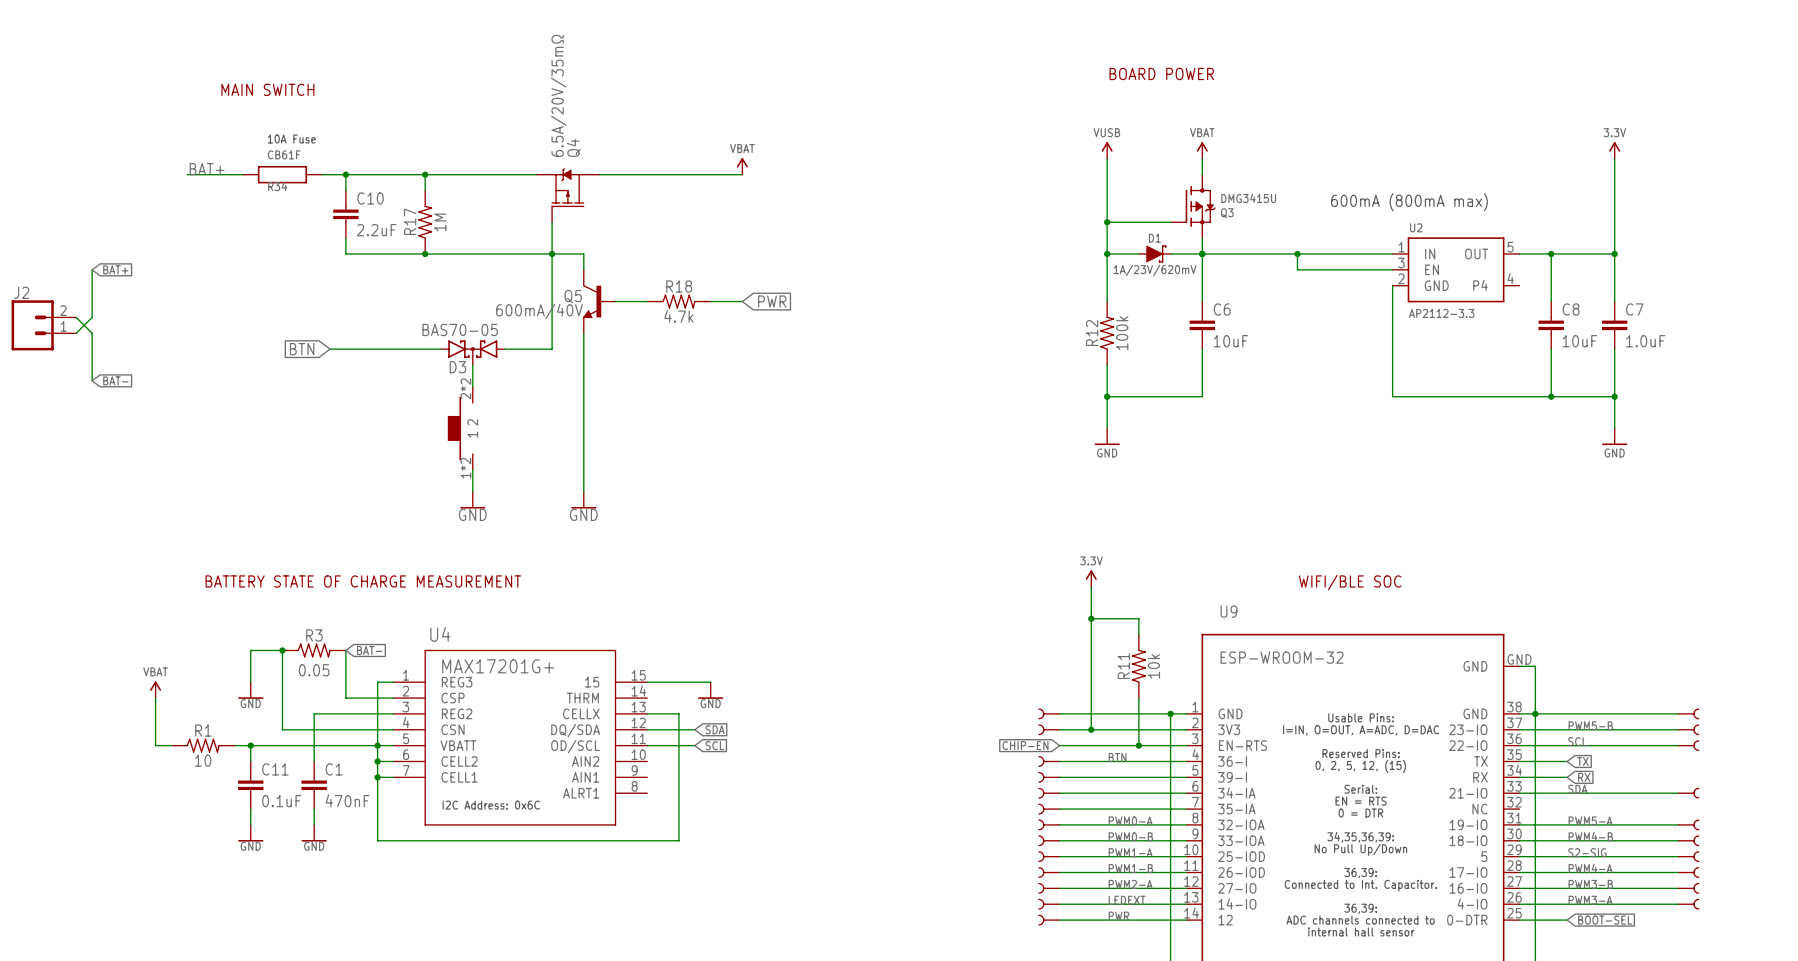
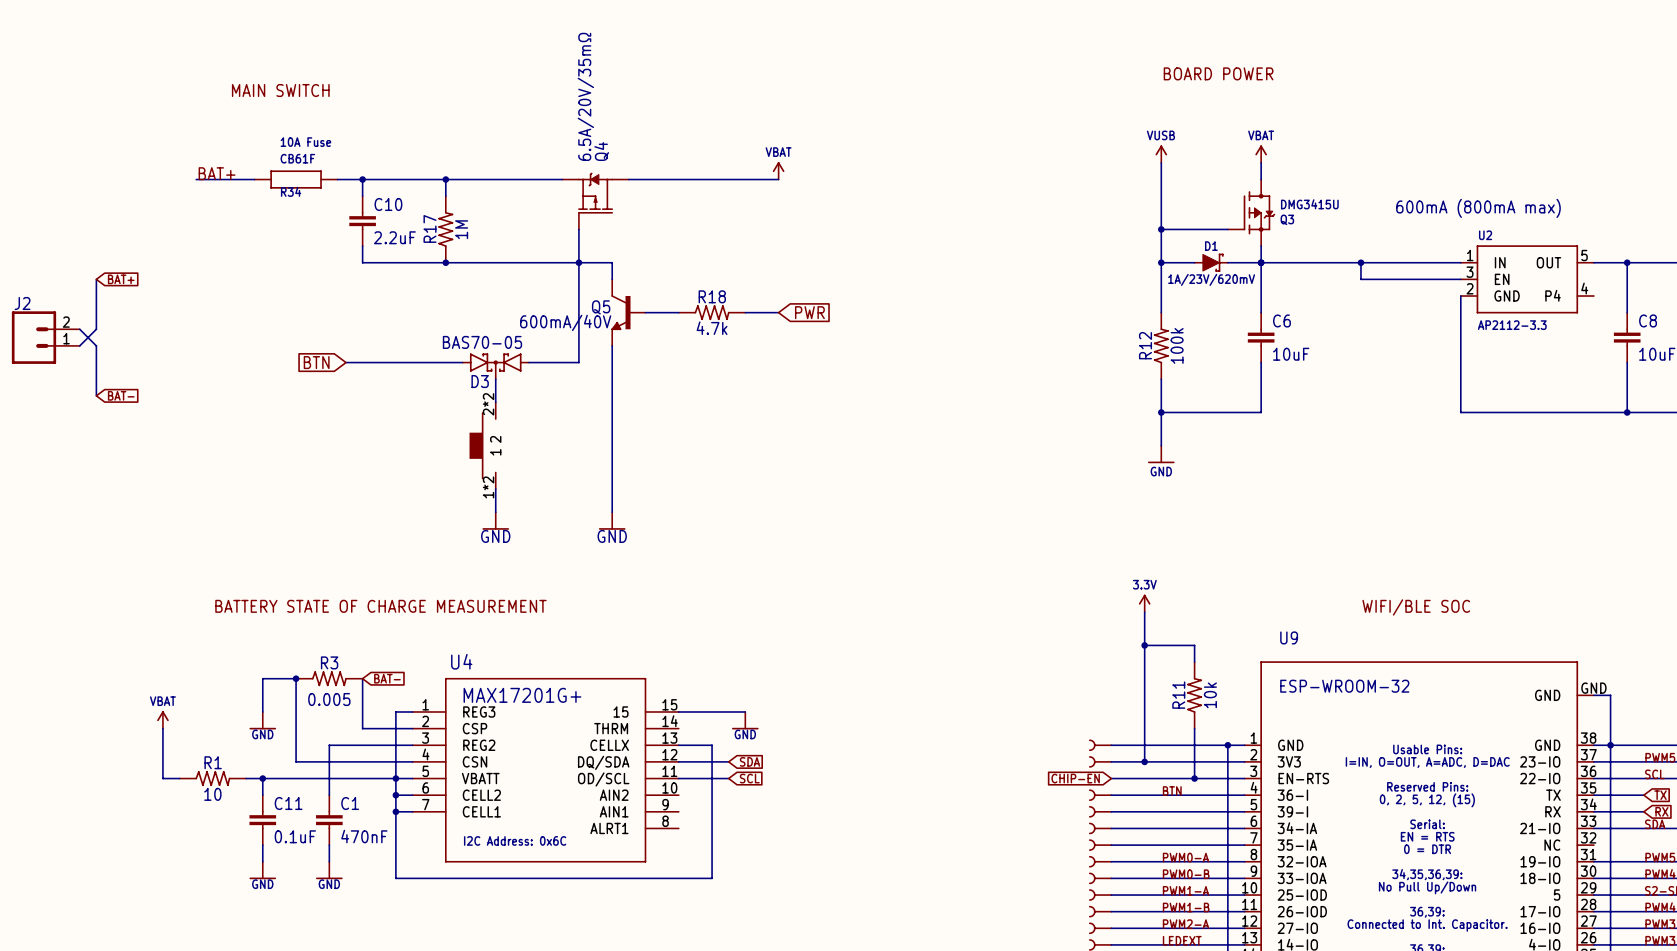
R3 value: 0.05 (314, 670) -> 0.005 (329, 699)

